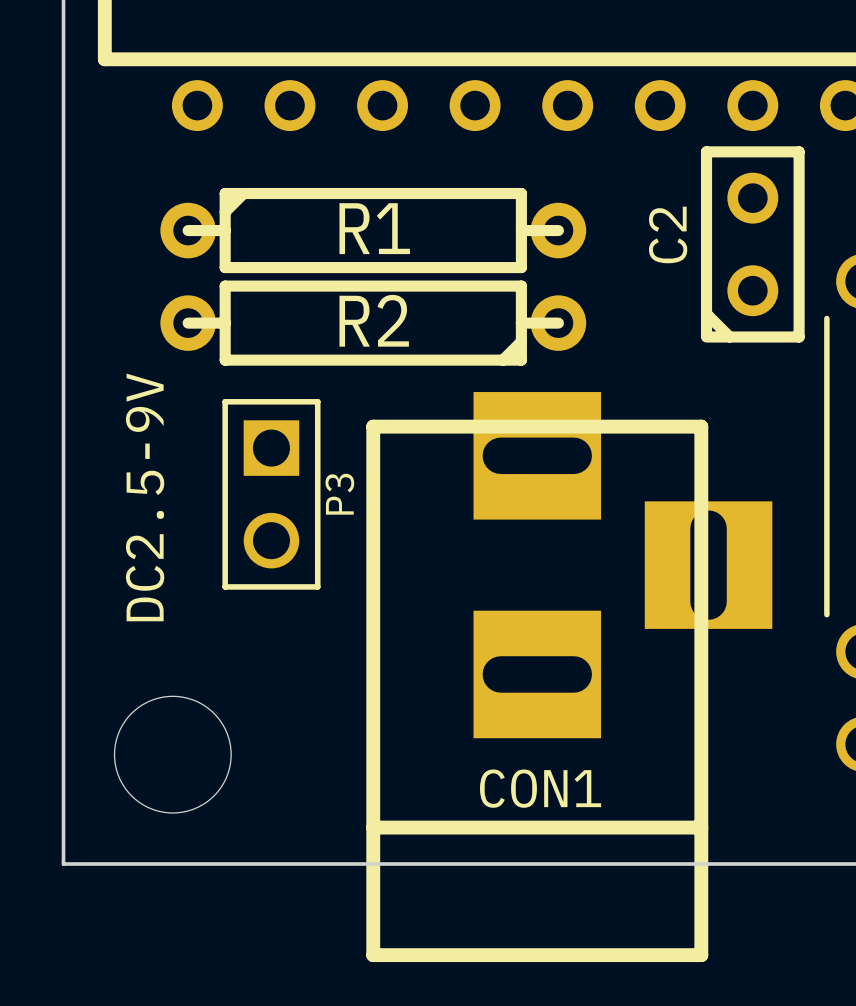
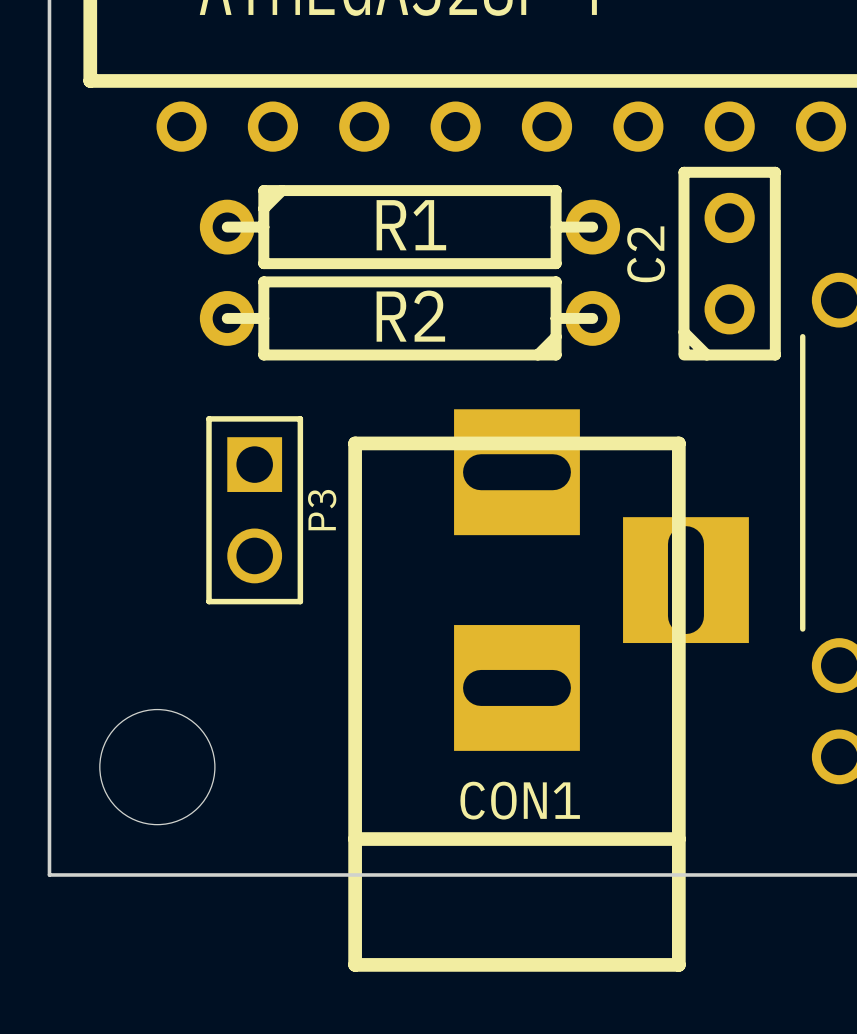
R1 position: (373, 230) -> (409, 227)
R2 position: (373, 323) -> (409, 318)
CON1 value: DC2.5-9V (145, 497) -> none

